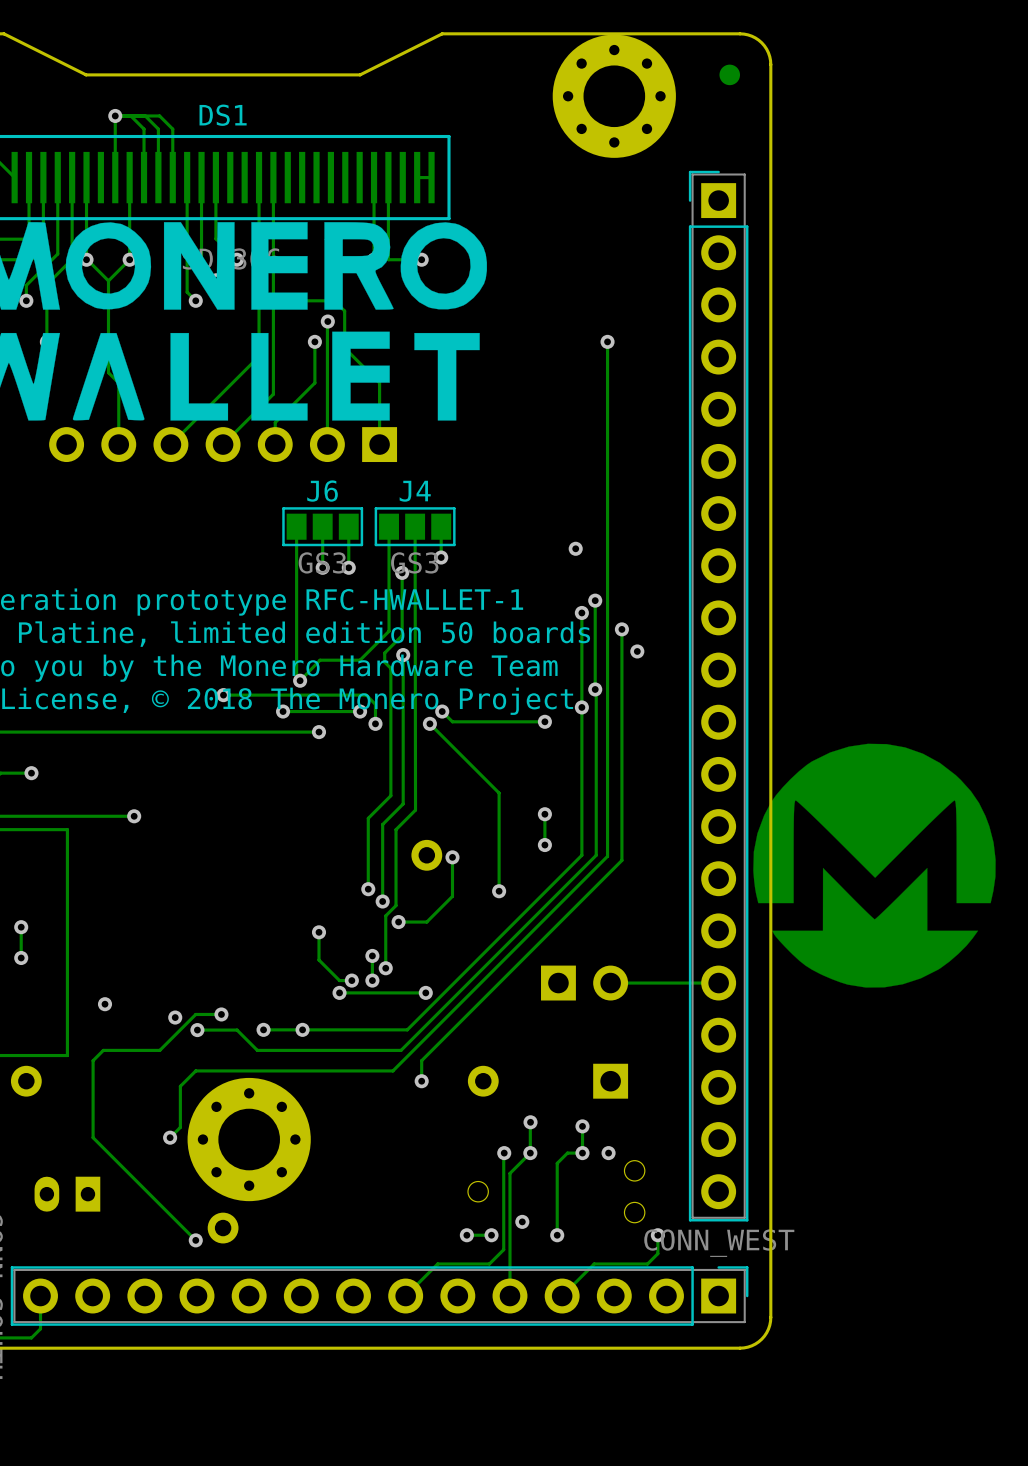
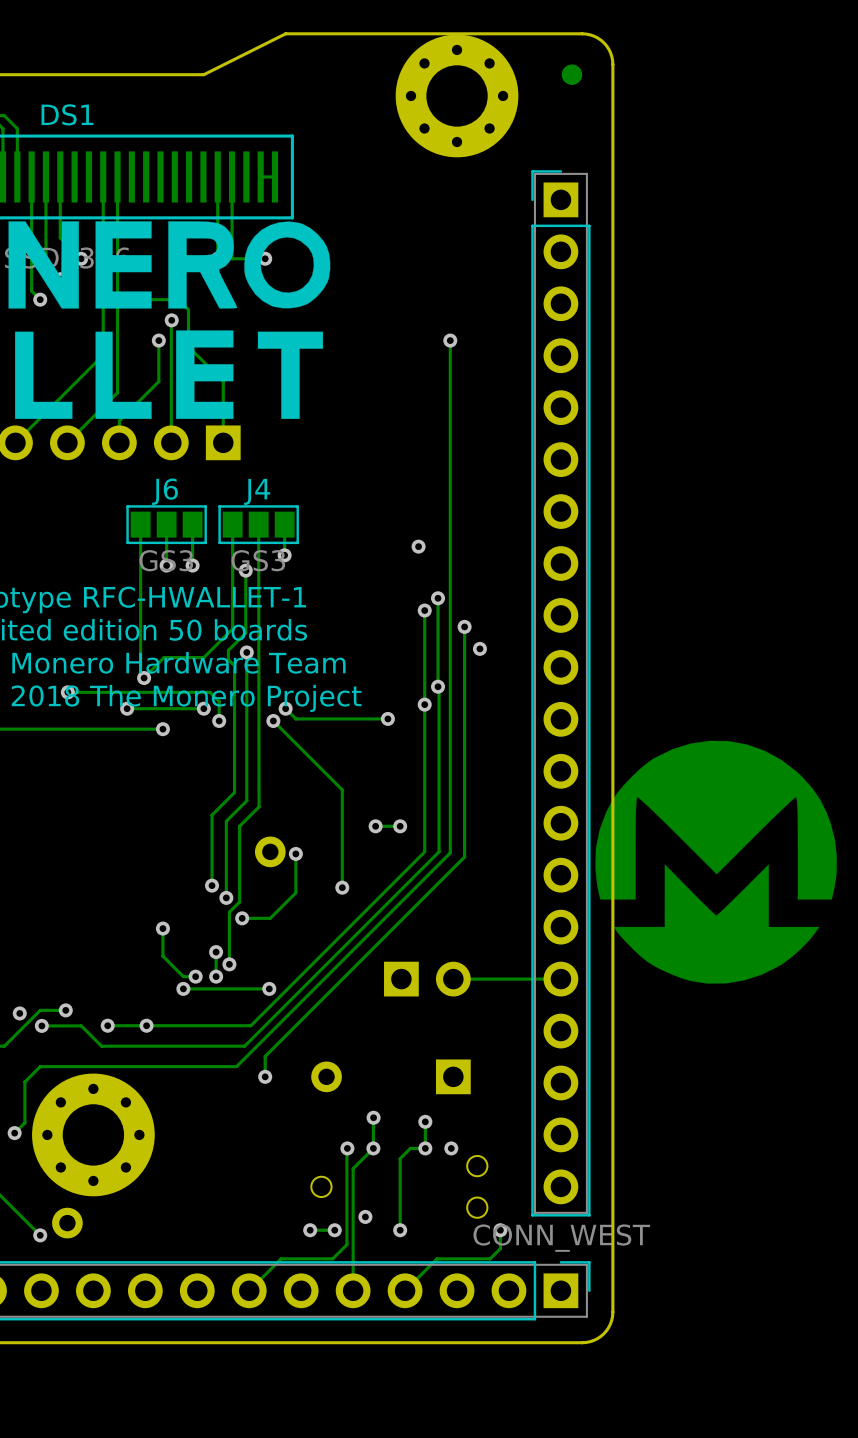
track: (544, 814) (544, 845) -> none
via: (544, 814) -> none
via: none -> (375, 826)
track: none -> (400, 826) (375, 826)
via: none -> (400, 826)
via: (544, 845) -> none

